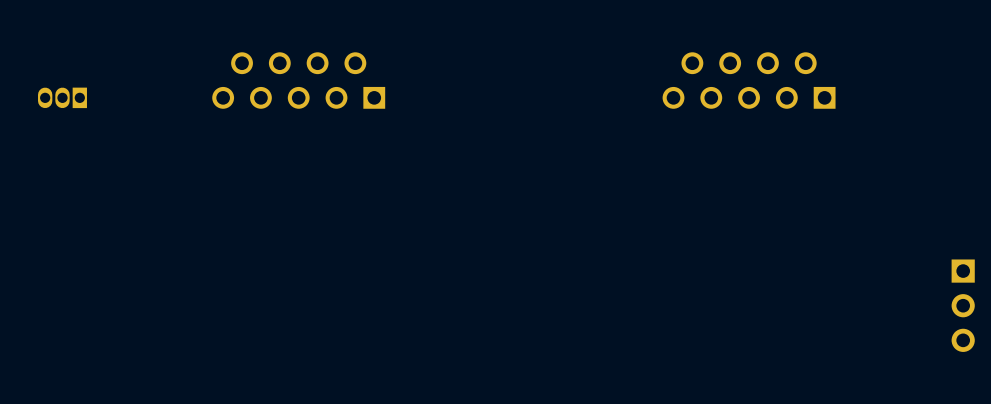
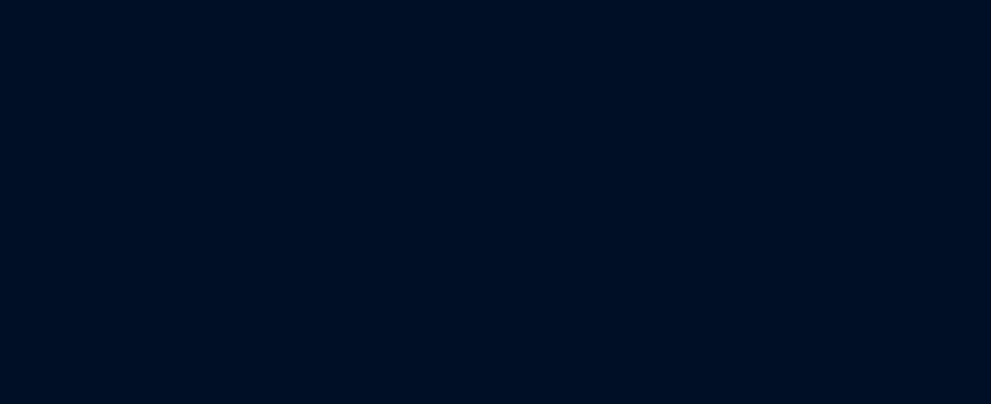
part: (298, 80) -> none
part: (749, 80) -> none
part: (62, 97) -> none
part: (963, 305) -> none

